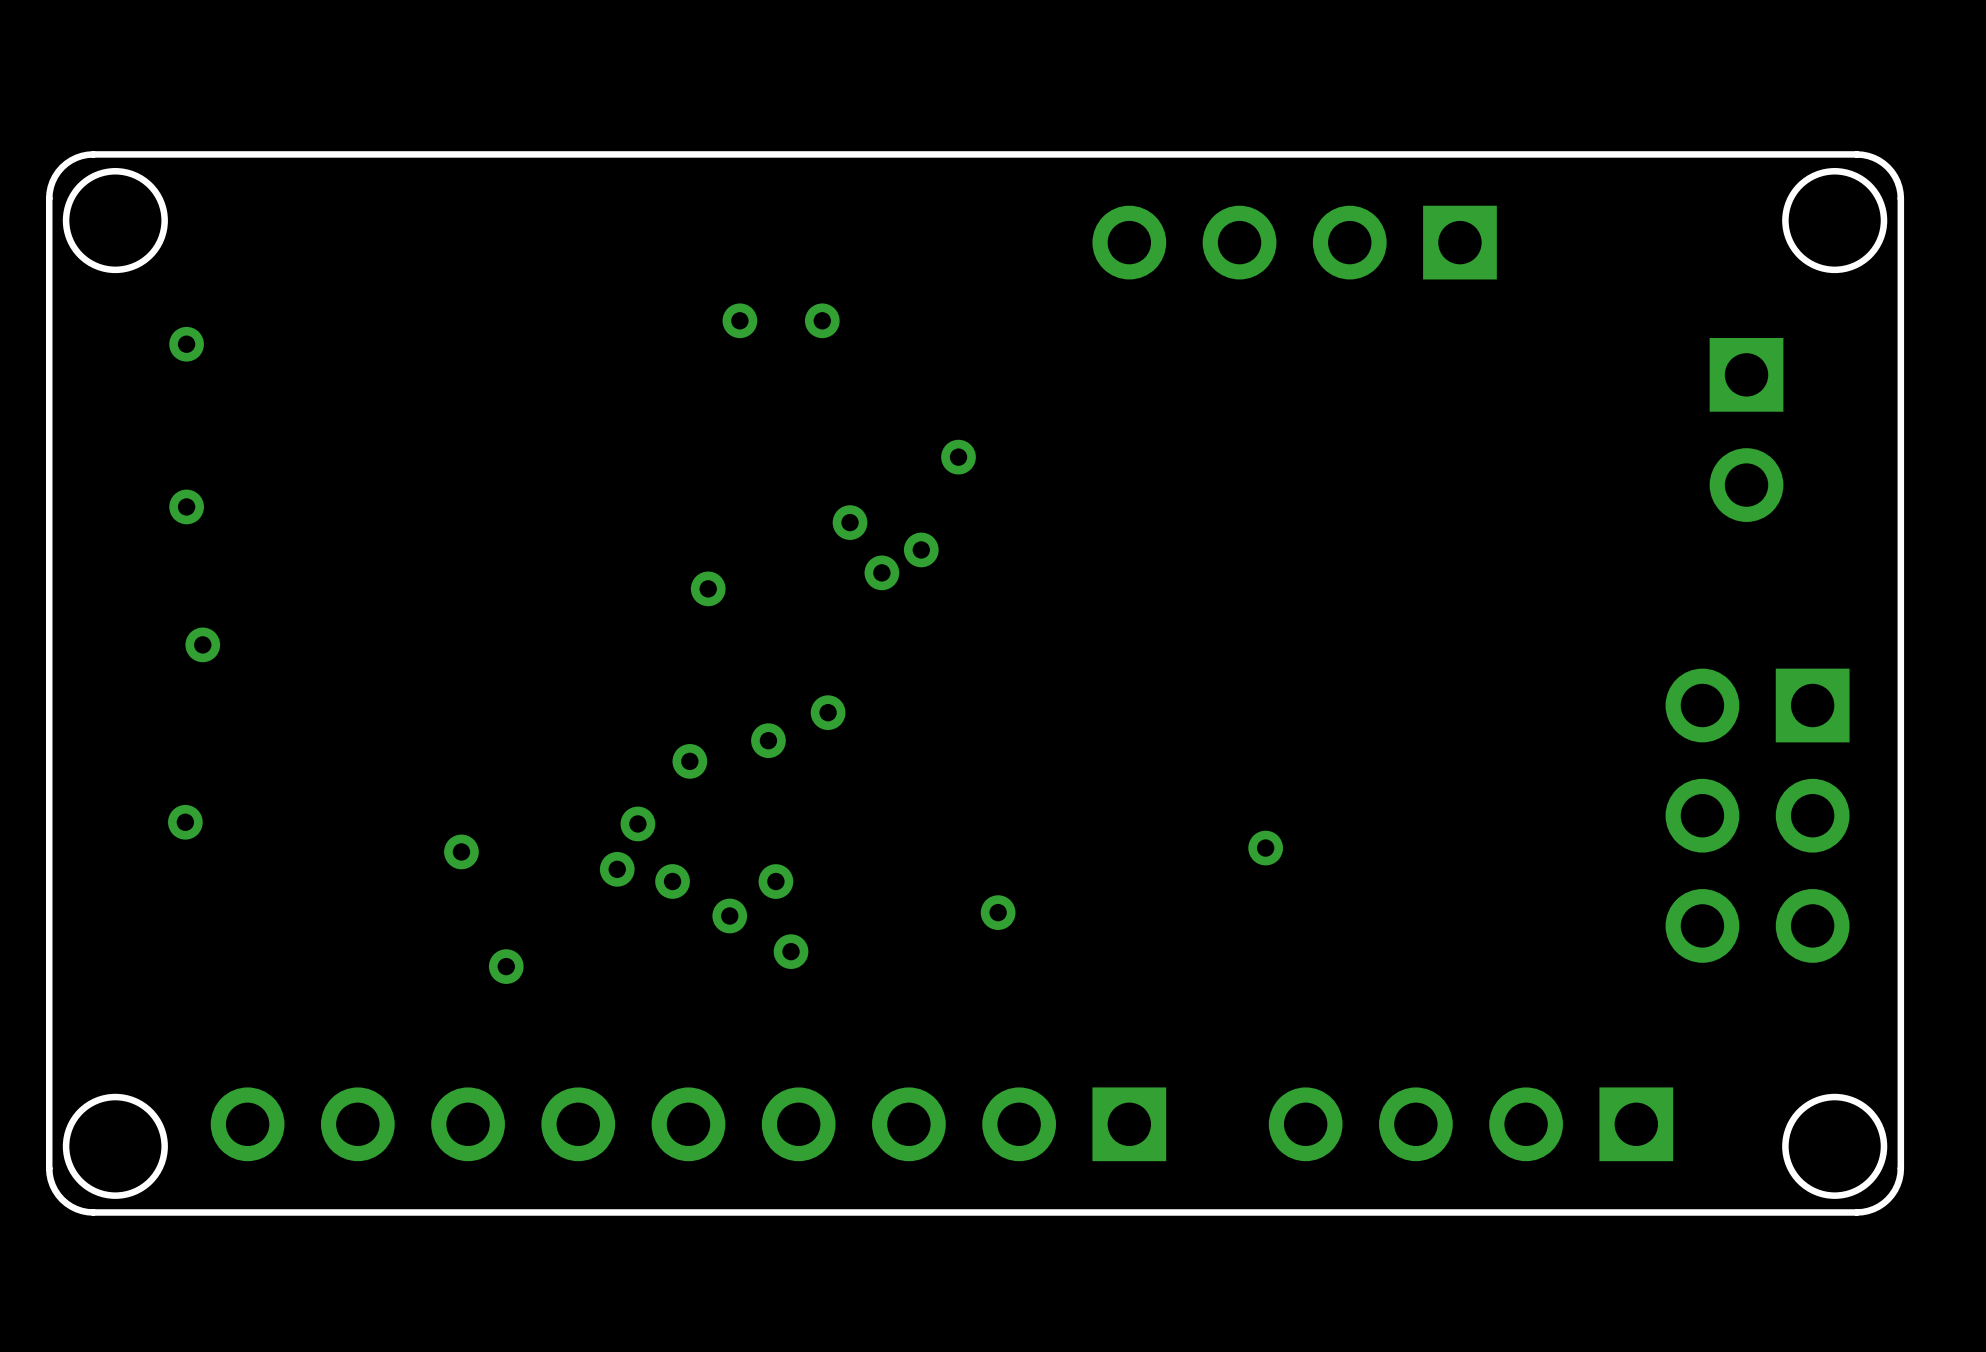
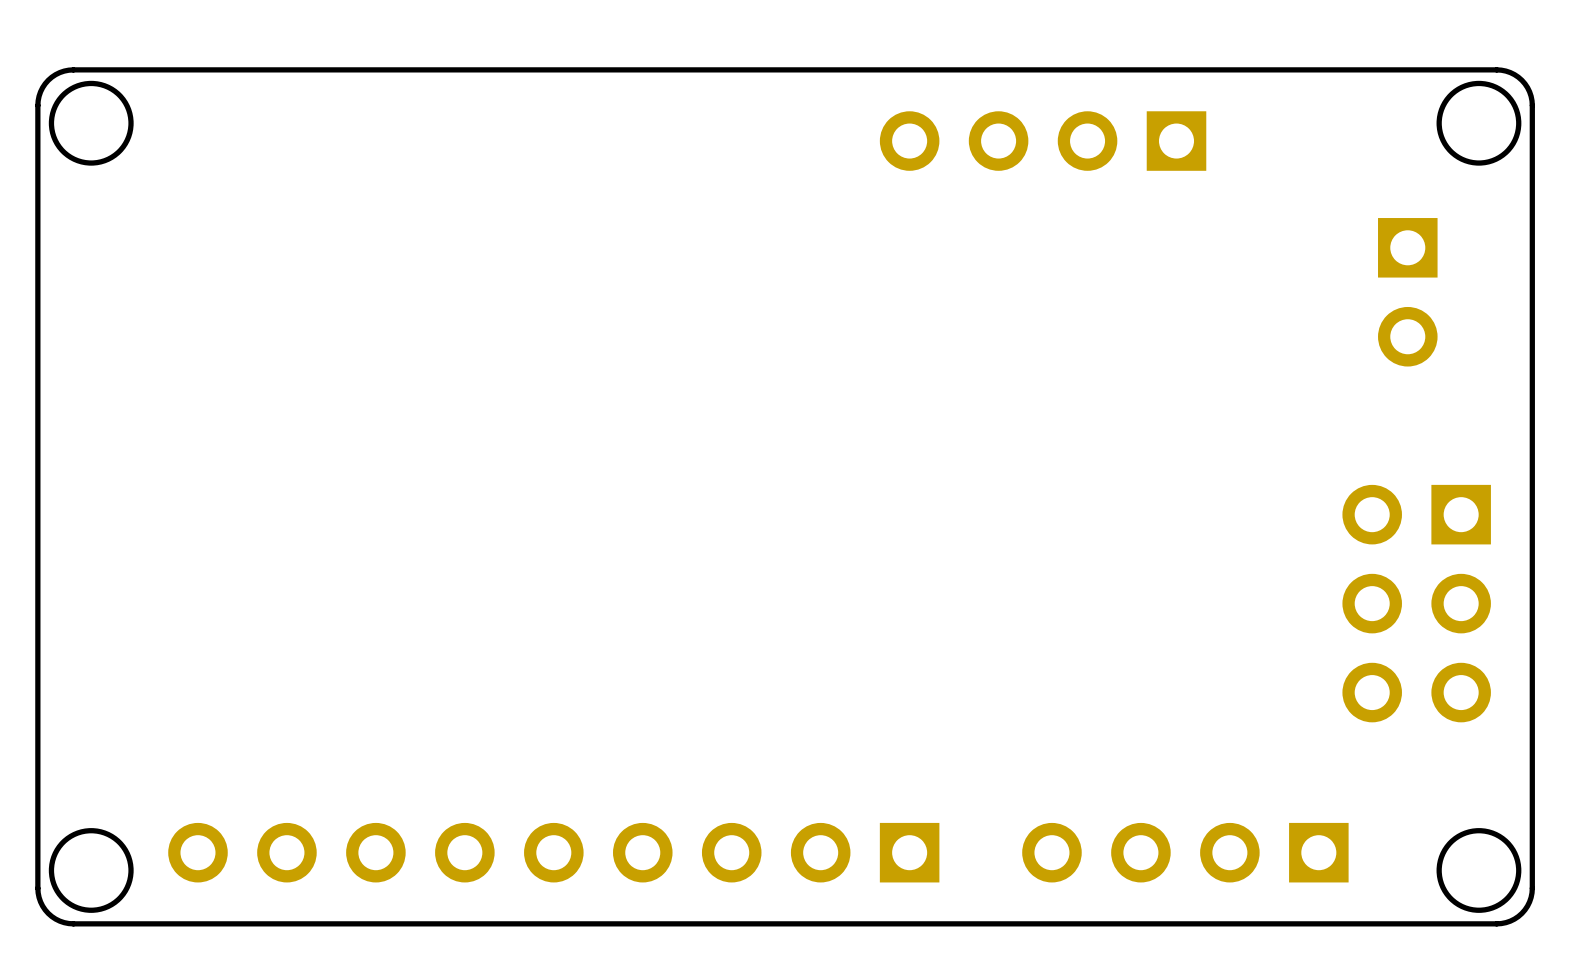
via: (739, 320) -> none
via: (822, 320) -> none
via: (186, 344) -> none
via: (958, 457) -> none
via: (186, 506) -> none
via: (850, 522) -> none
via: (921, 549) -> none
via: (881, 572) -> none
via: (708, 588) -> none
via: (202, 644) -> none
via: (828, 712) -> none
via: (768, 740) -> none
via: (689, 761) -> none
via: (185, 822) -> none
via: (637, 823) -> none
via: (1265, 848) -> none
via: (461, 851) -> none
via: (617, 869) -> none
via: (672, 881) -> none
via: (775, 881) -> none
via: (998, 912) -> none
via: (729, 915) -> none
via: (791, 951) -> none
via: (506, 966) -> none

